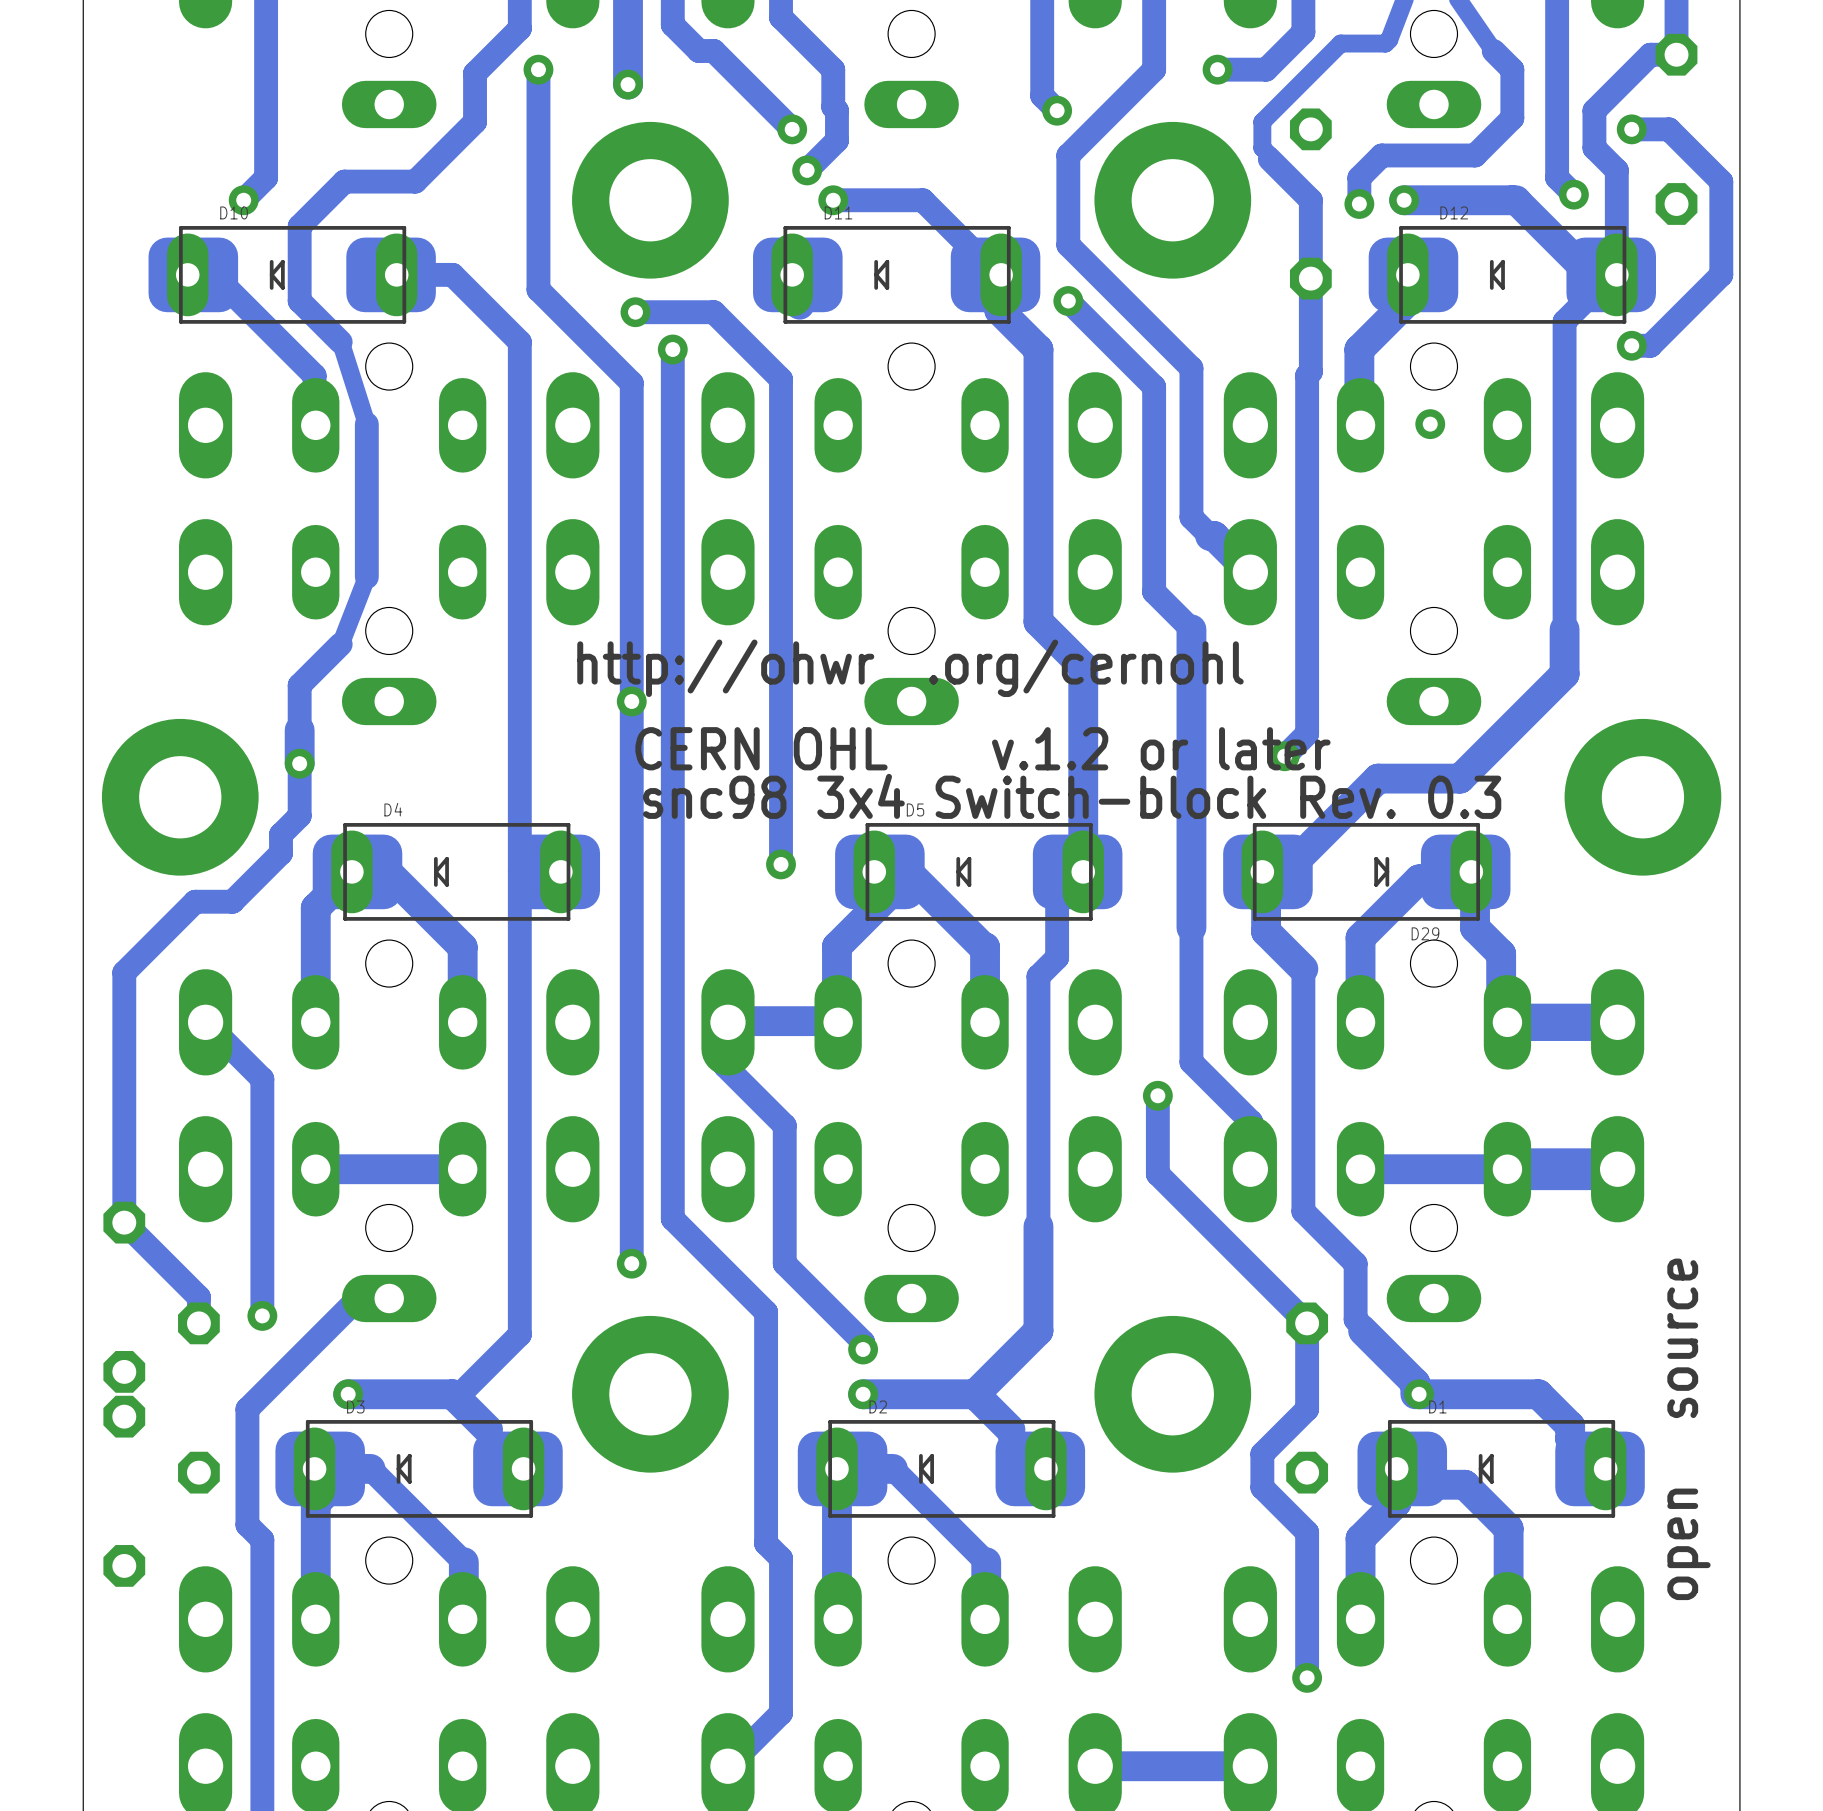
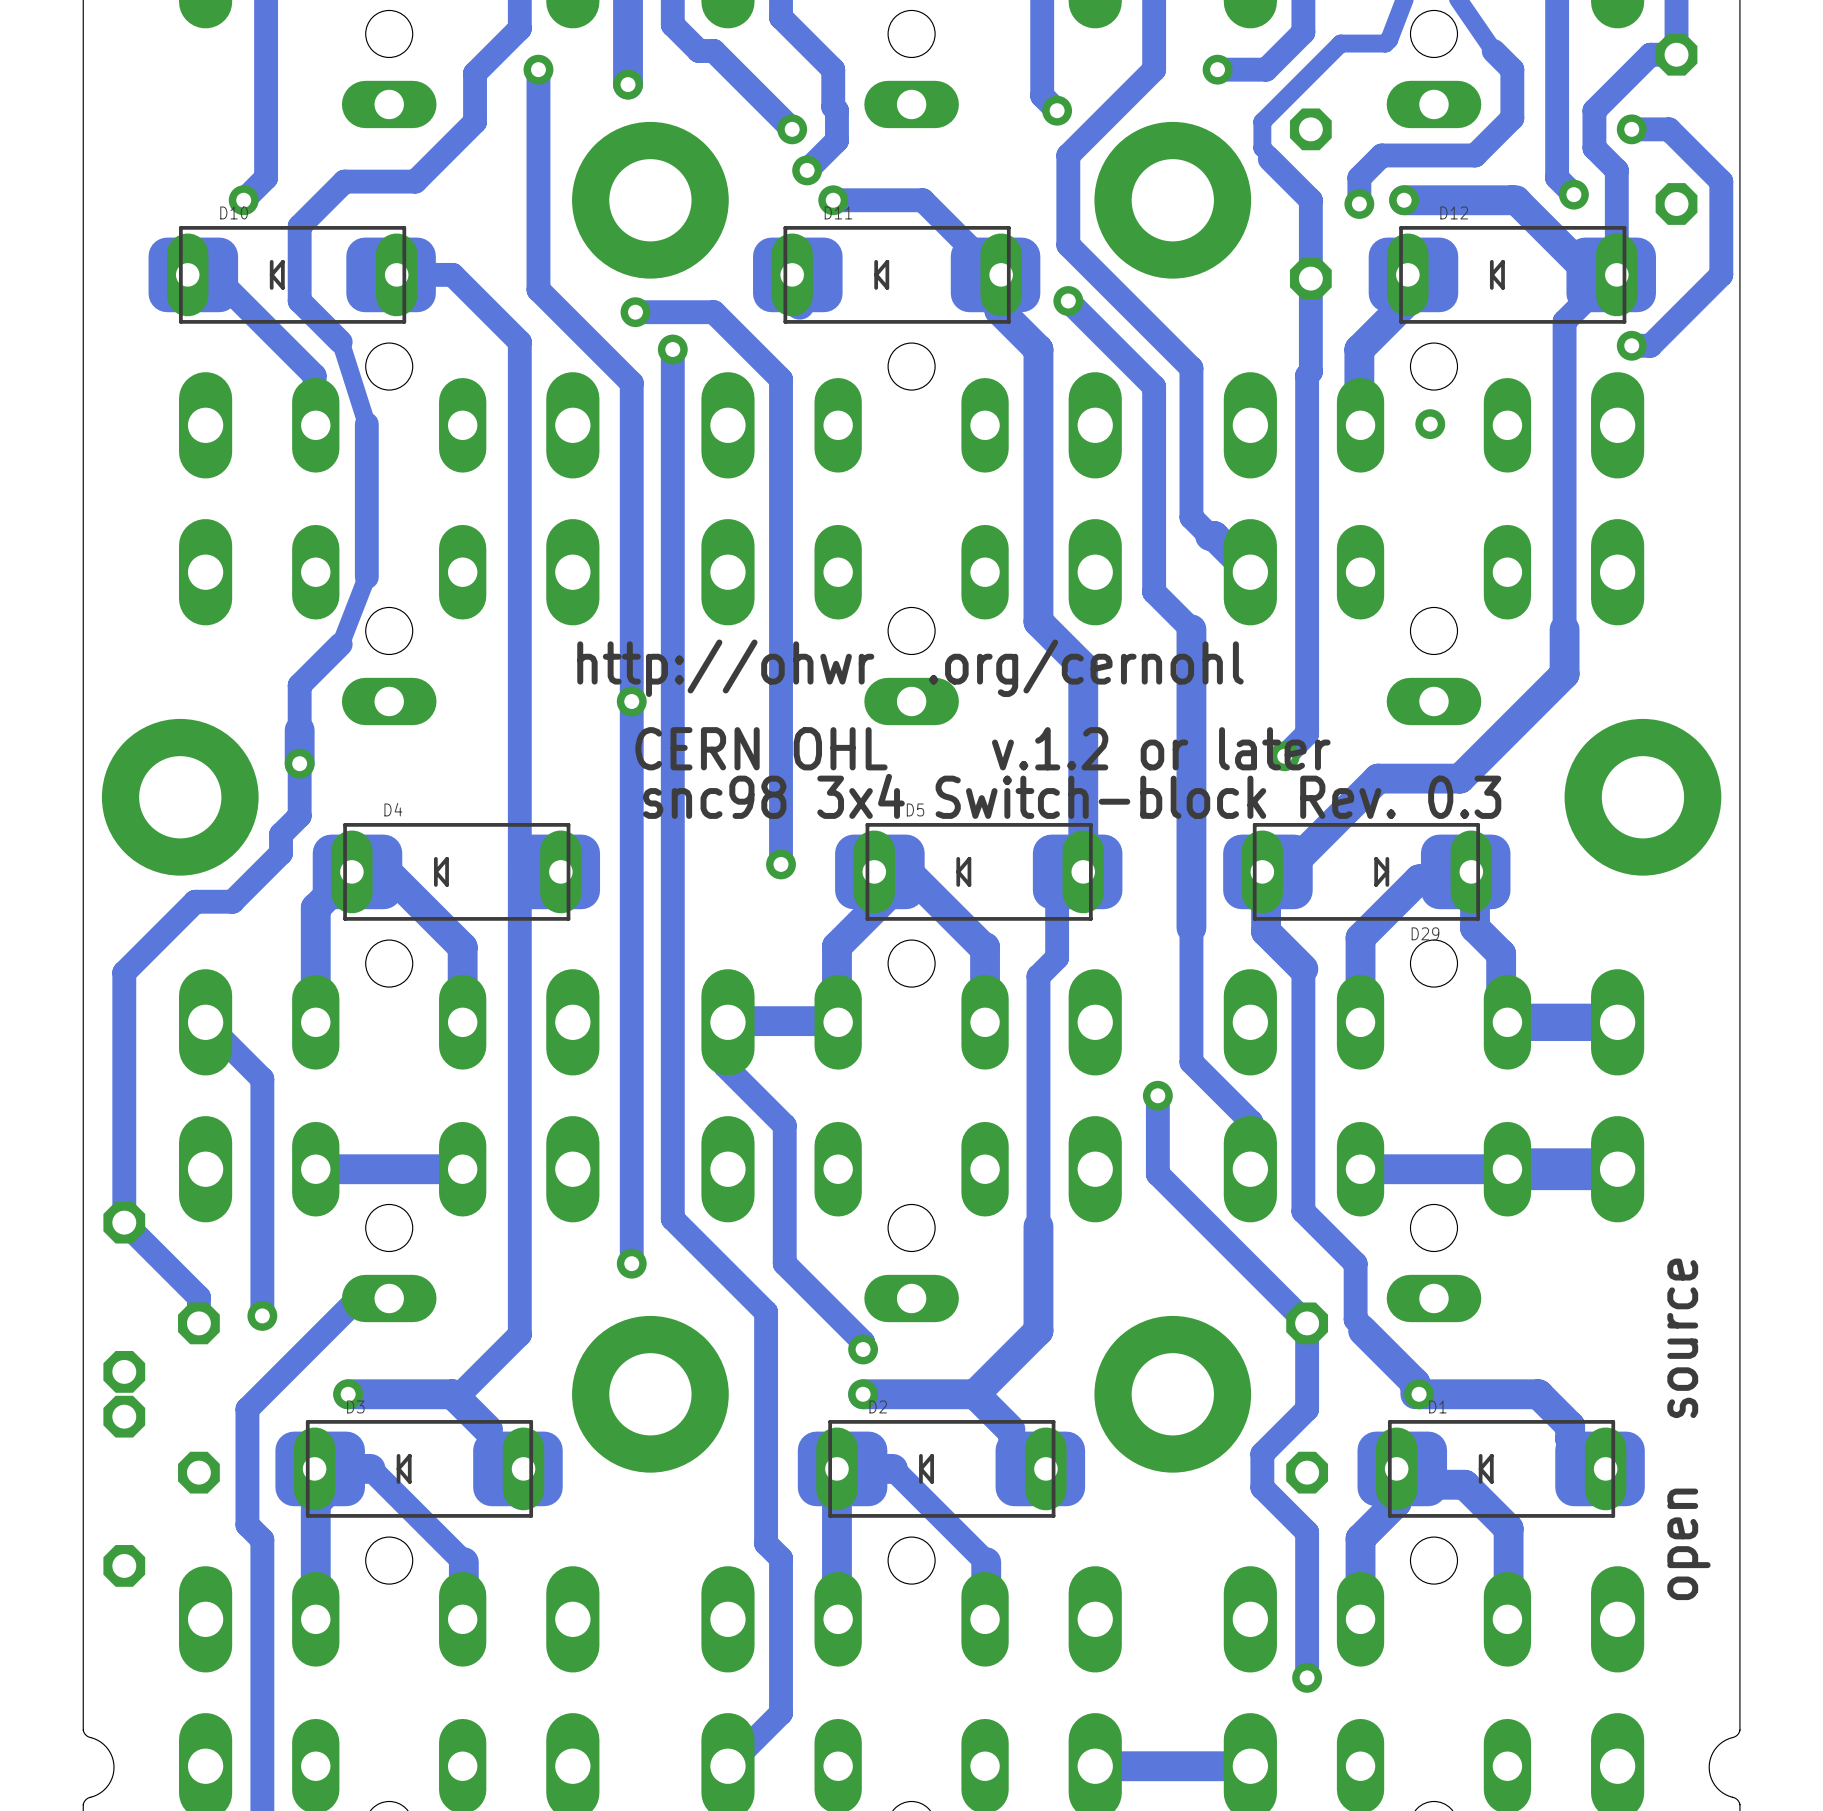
board edge: (83, 1730) (83, 1804) -> (83, 1730) (86, 1735) (97, 1740) (106, 1747) (112, 1756) (114, 1767) (112, 1778) (106, 1787) (97, 1794) (86, 1799) (83, 1804)
board edge: (1739, 1730) (1739, 1804) -> (1739, 1730) (1736, 1735) (1725, 1740) (1716, 1747) (1711, 1756) (1709, 1767) (1711, 1778) (1716, 1787) (1725, 1794) (1736, 1799) (1739, 1804)

